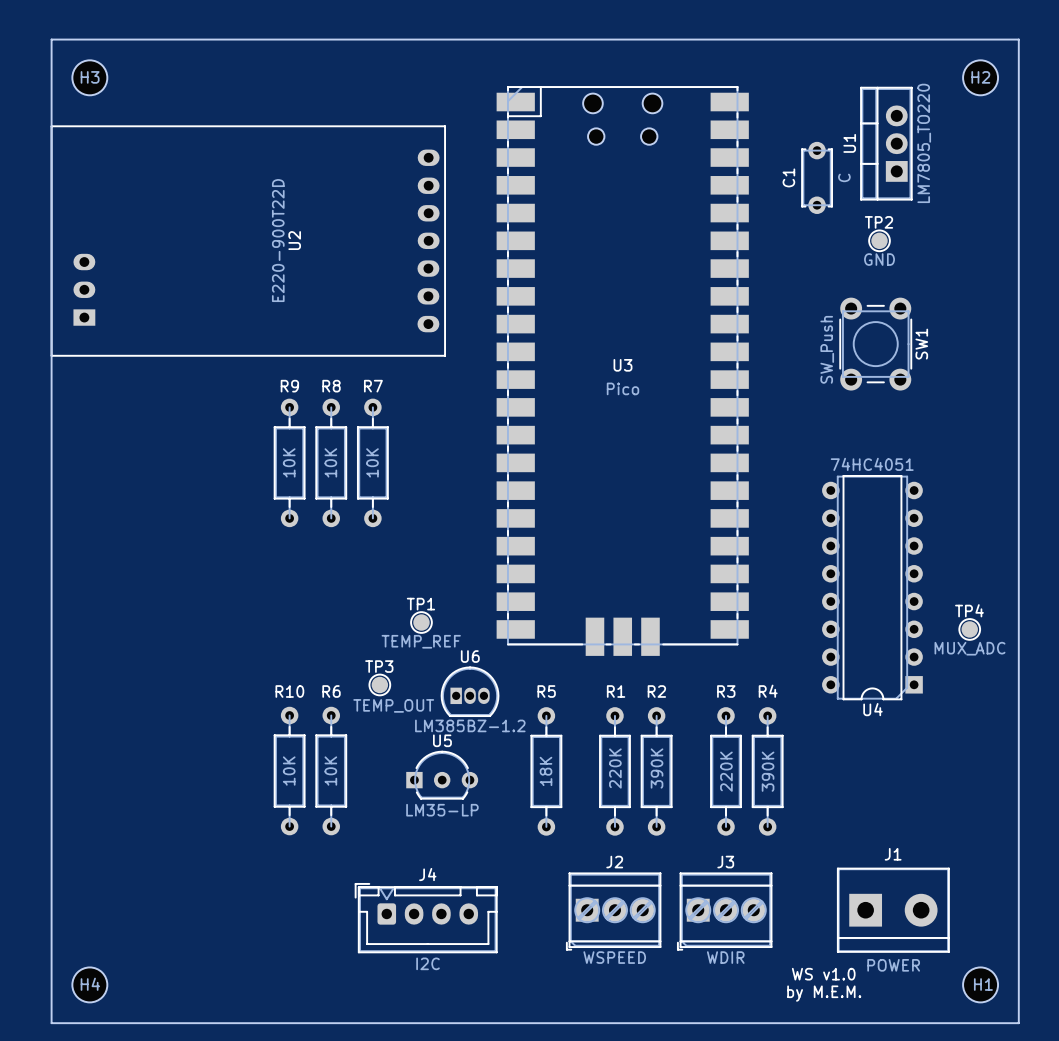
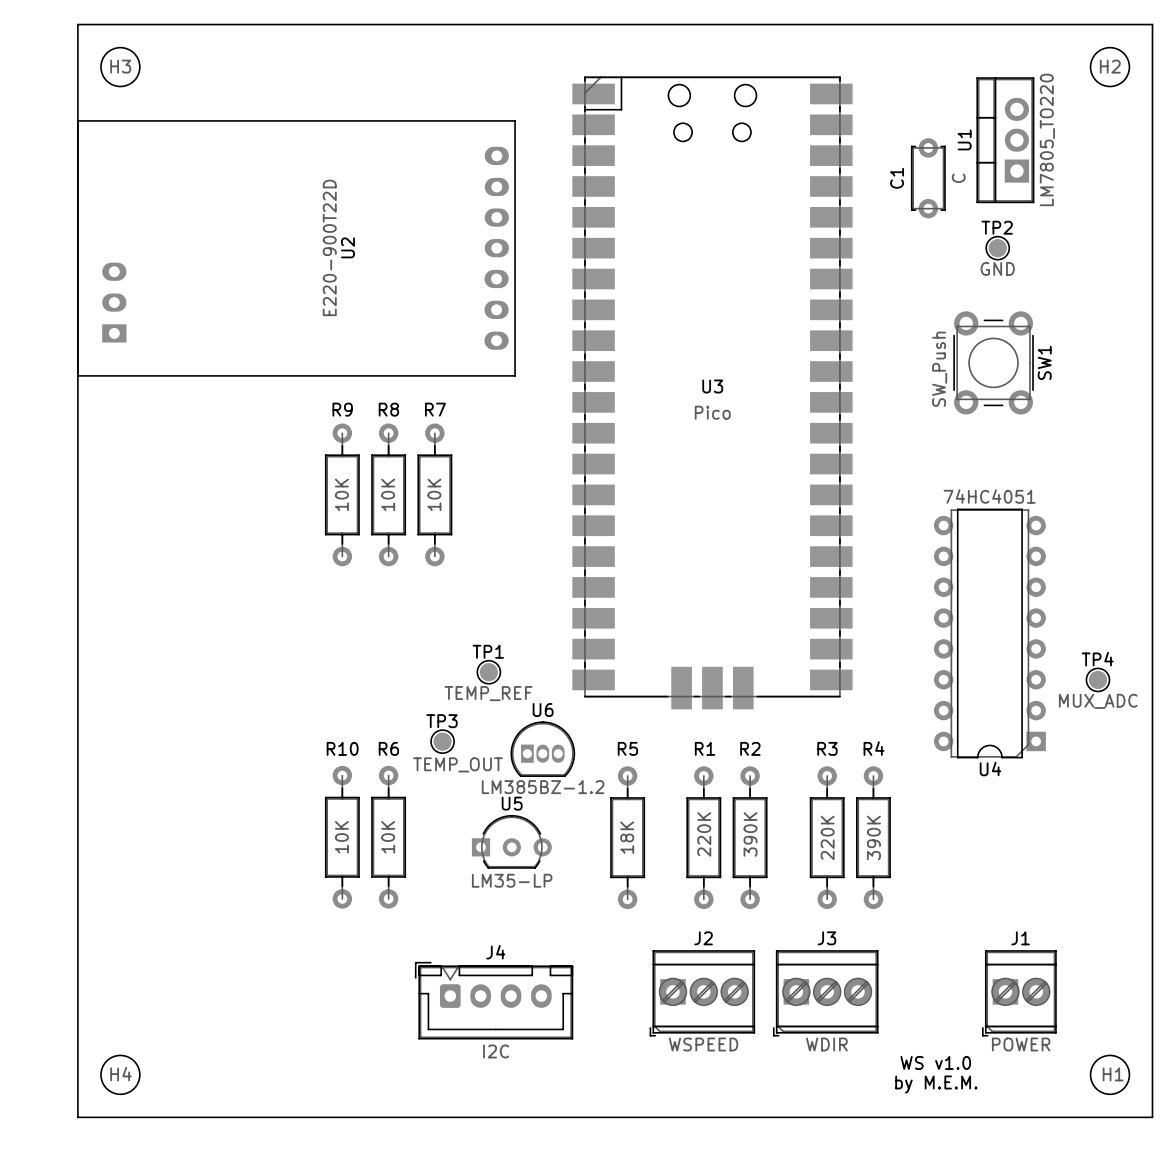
J1 footprint: [837, 867, 950, 953] -> [982, 950, 1057, 1037]

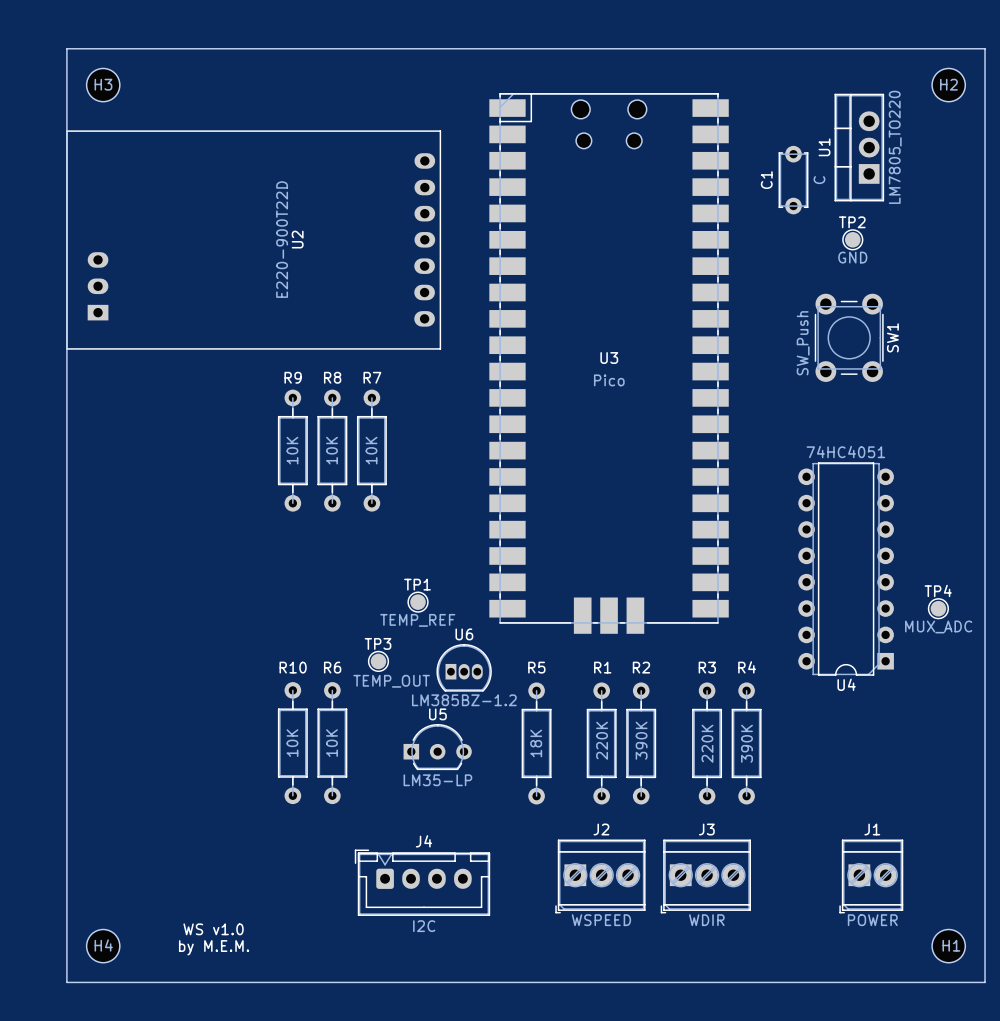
text: none -> WS v1.0 (213, 929)
text: WS v1.0 (935, 1062) -> none
text: none -> by M.E.M. (214, 947)
text: by M.E.M. (936, 1084) -> none

